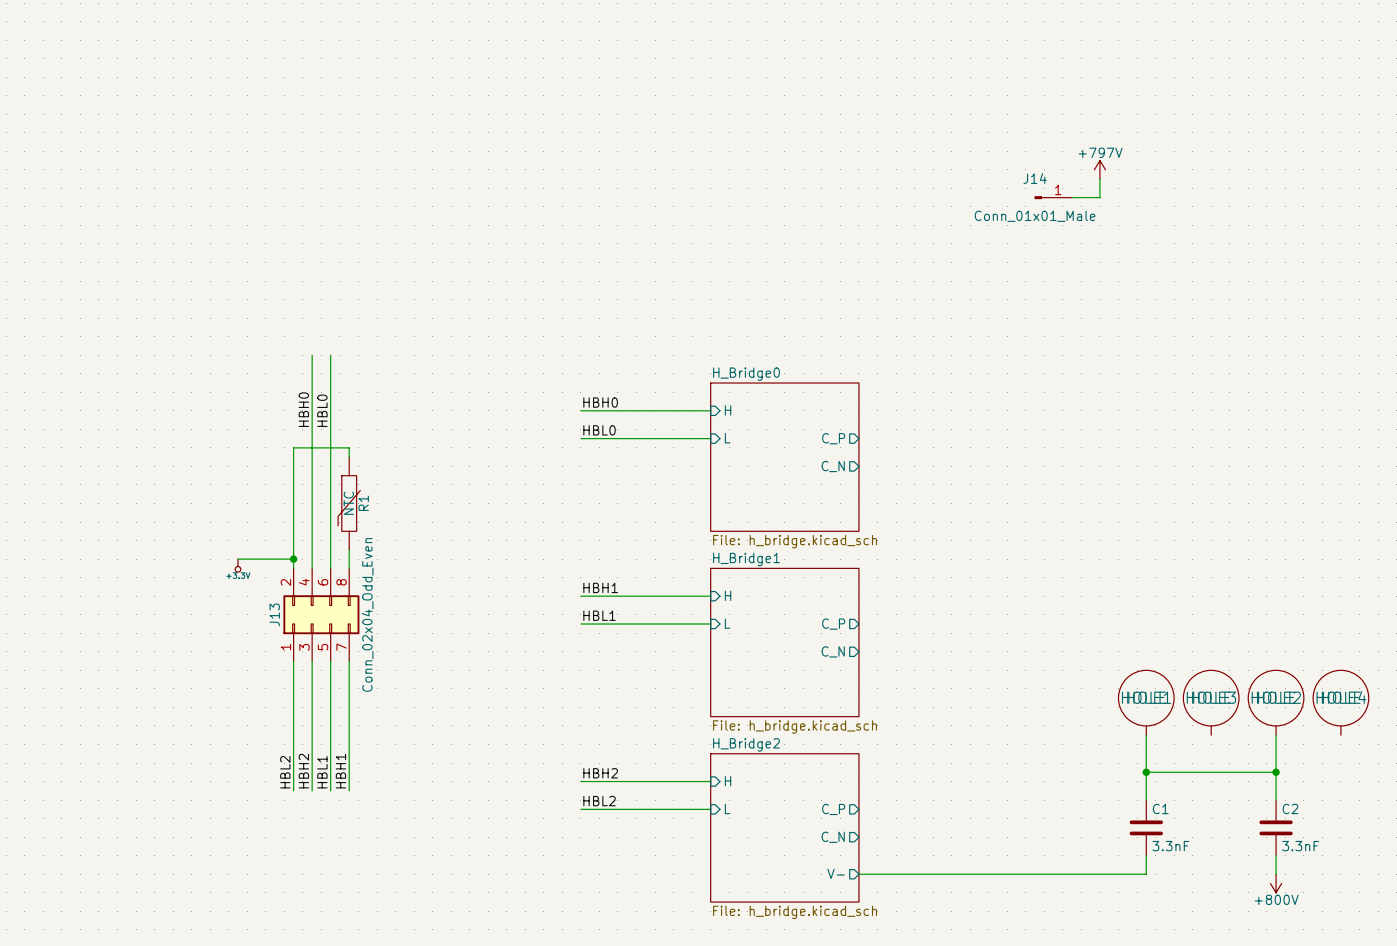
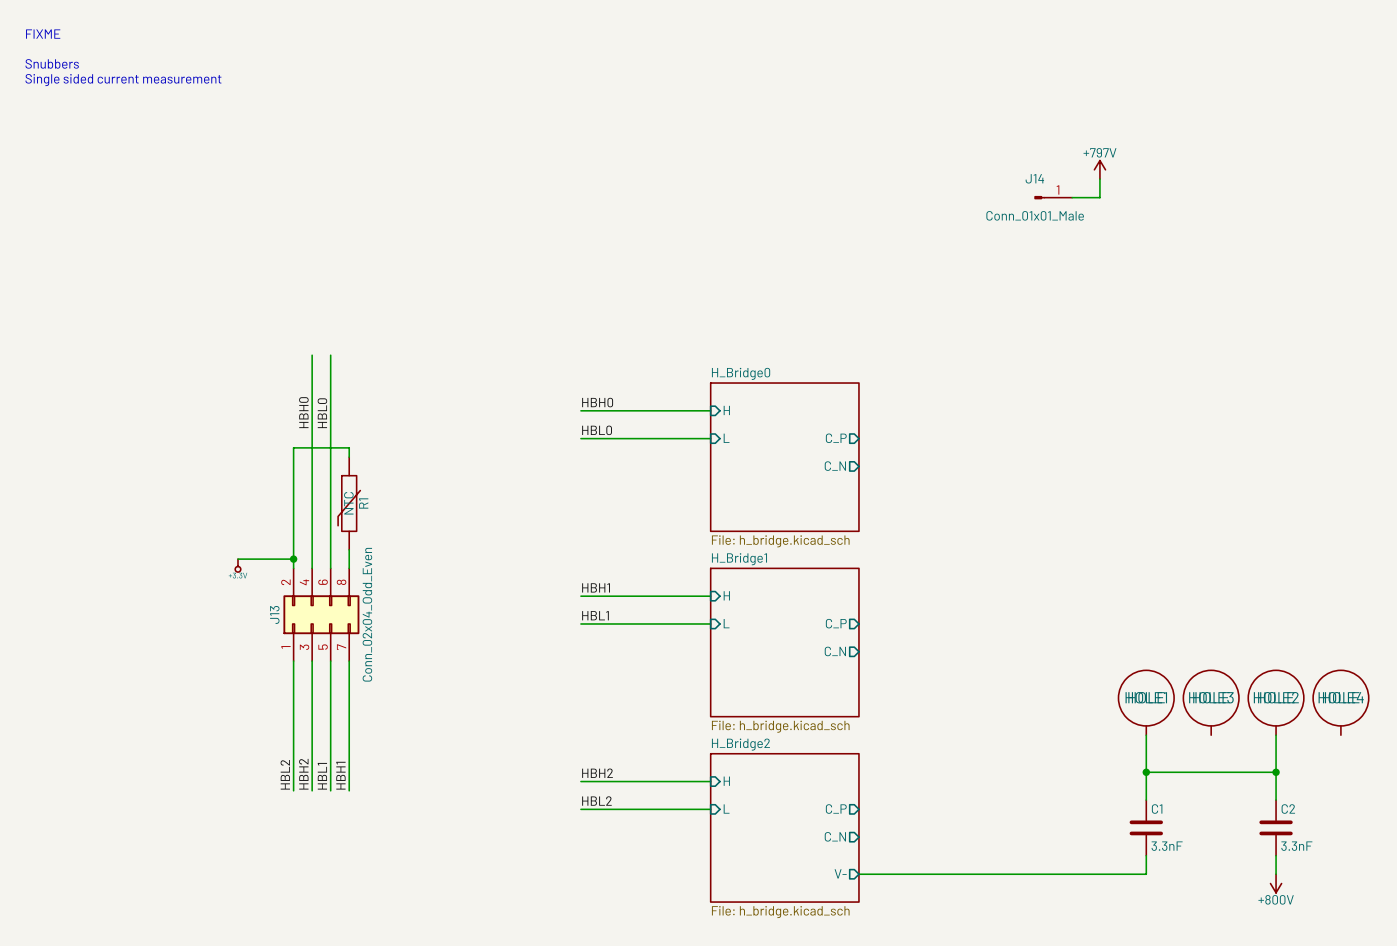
text: none -> FIXME (43, 34)
text: none -> Snubbers (52, 63)
text: none -> Single sided current measurement (123, 80)

